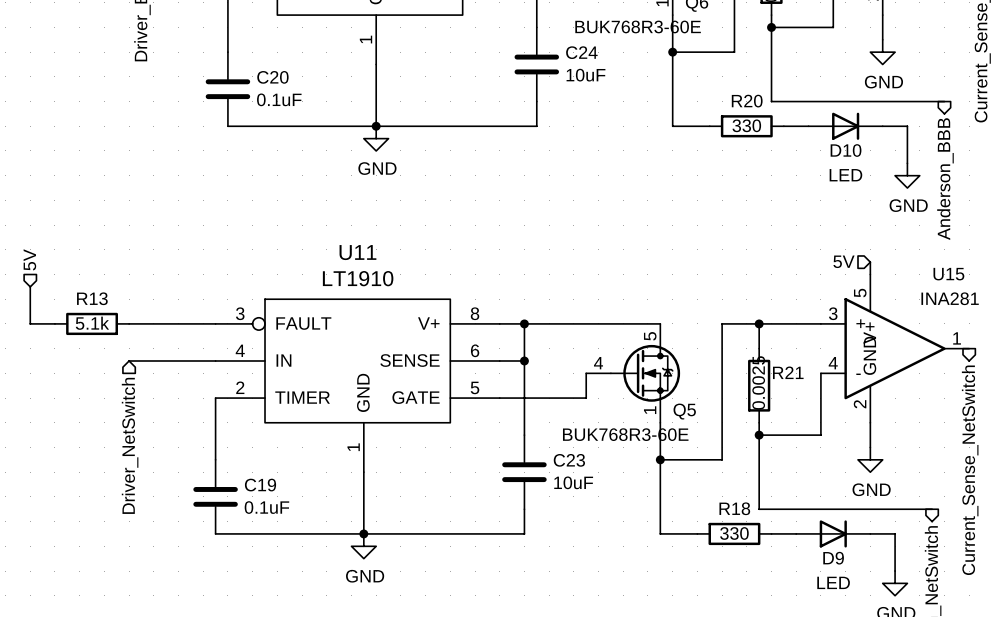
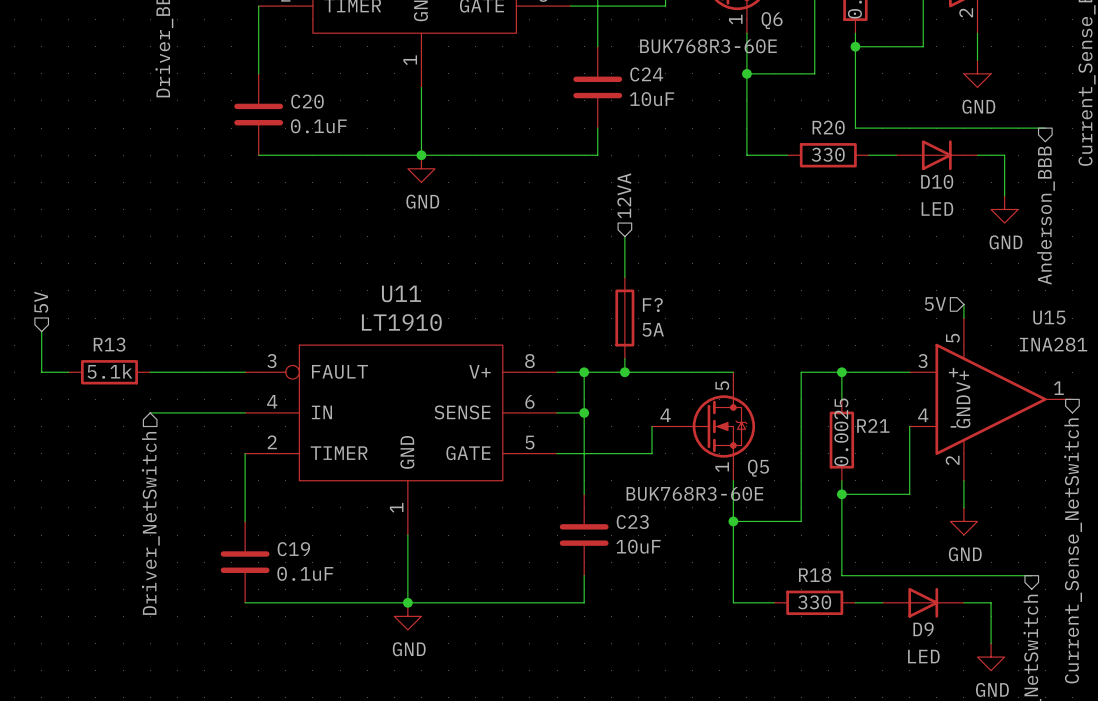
hierarchical label: none -> 12VA (624, 195)
wire: none -> (624, 236) (624, 277)
F?: none -> 5A (624, 318)
wire: none -> (624, 358) (624, 372)
junction: none -> (624, 372)

